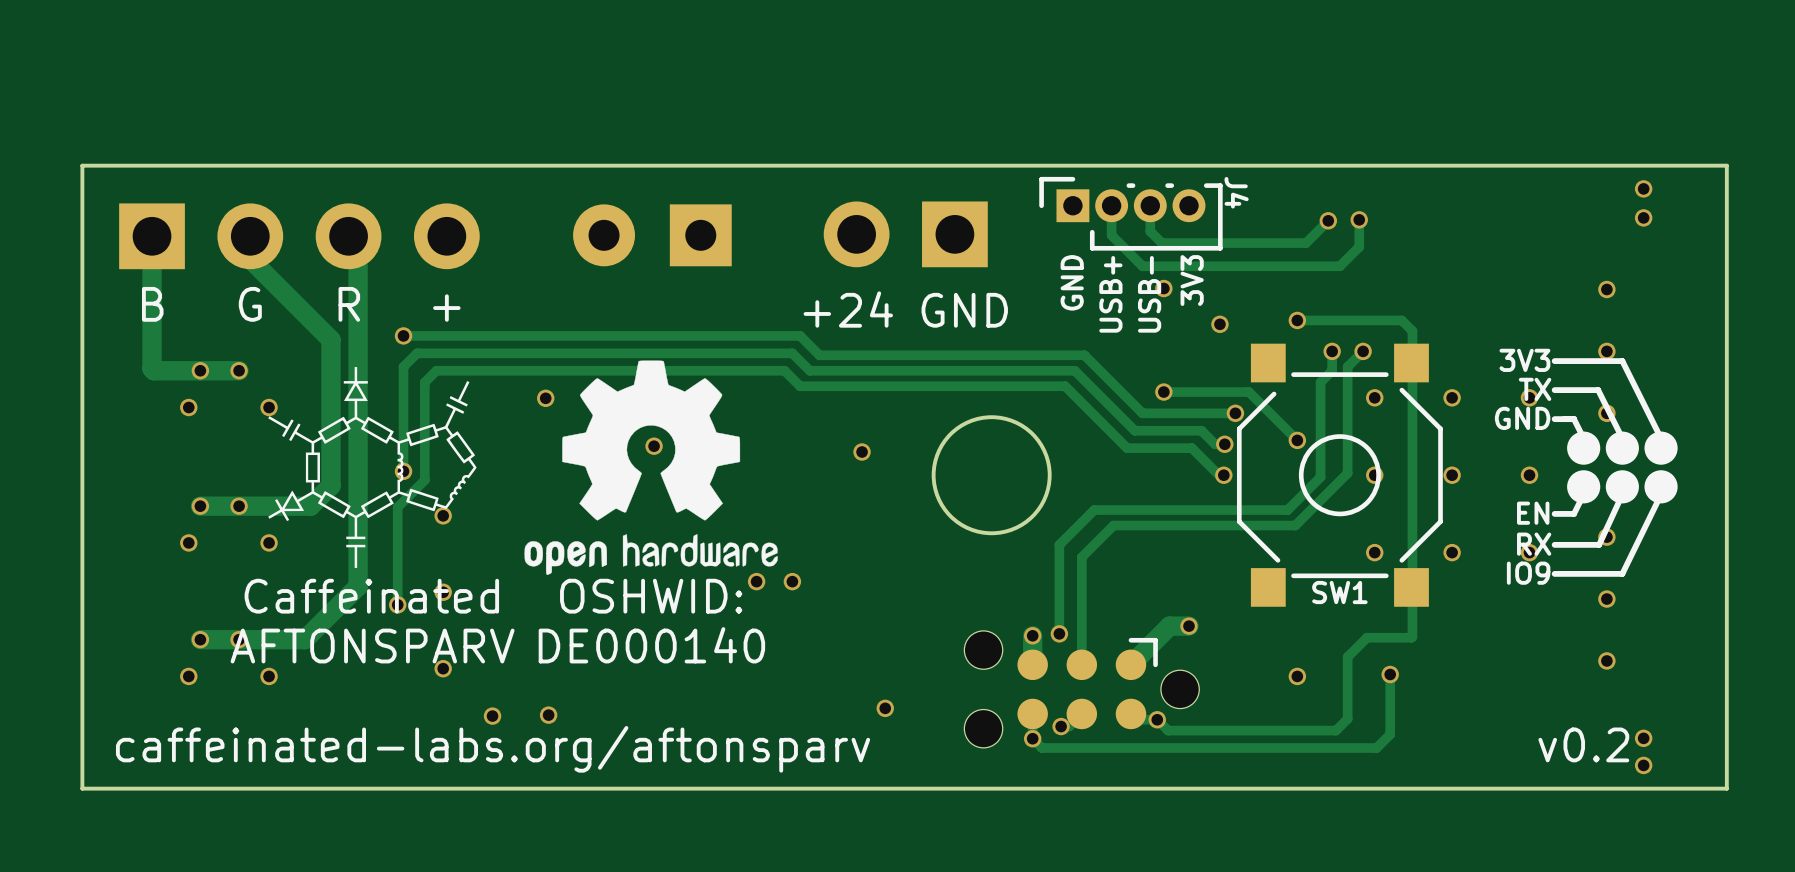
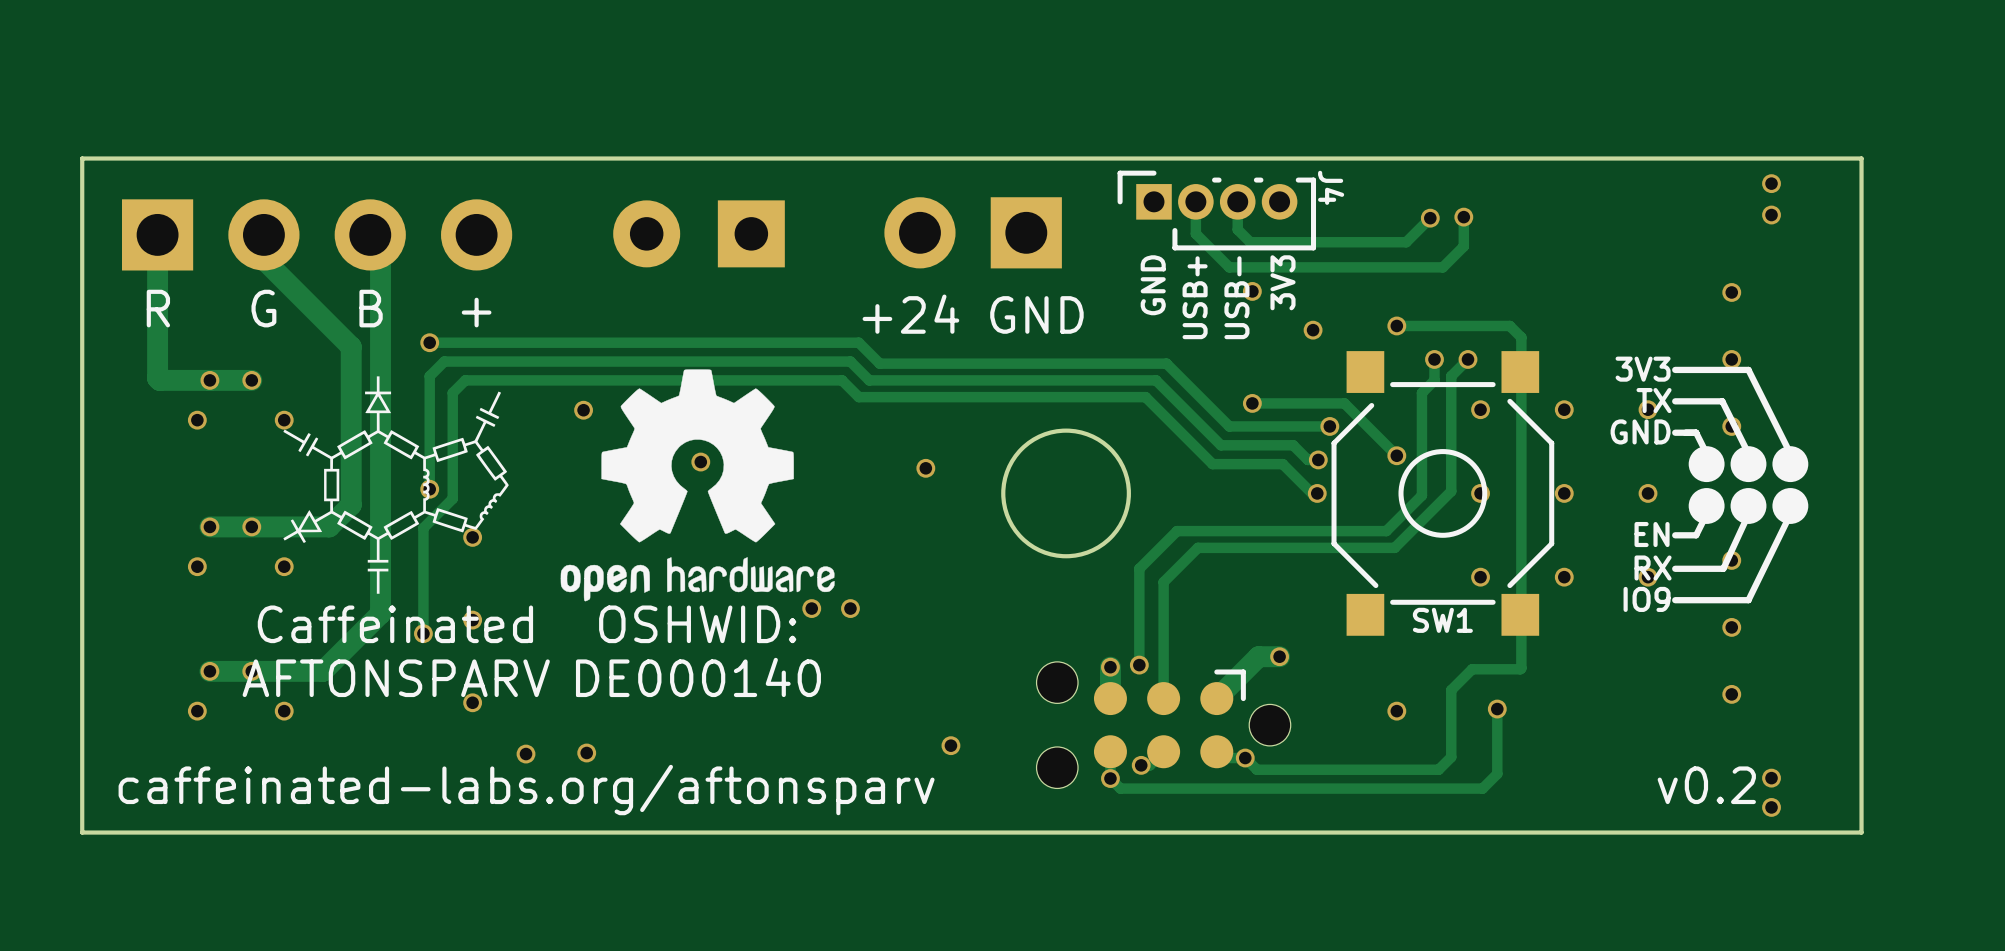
text: B (152, 304) -> R (158, 308)
text: R (349, 304) -> B (371, 308)

